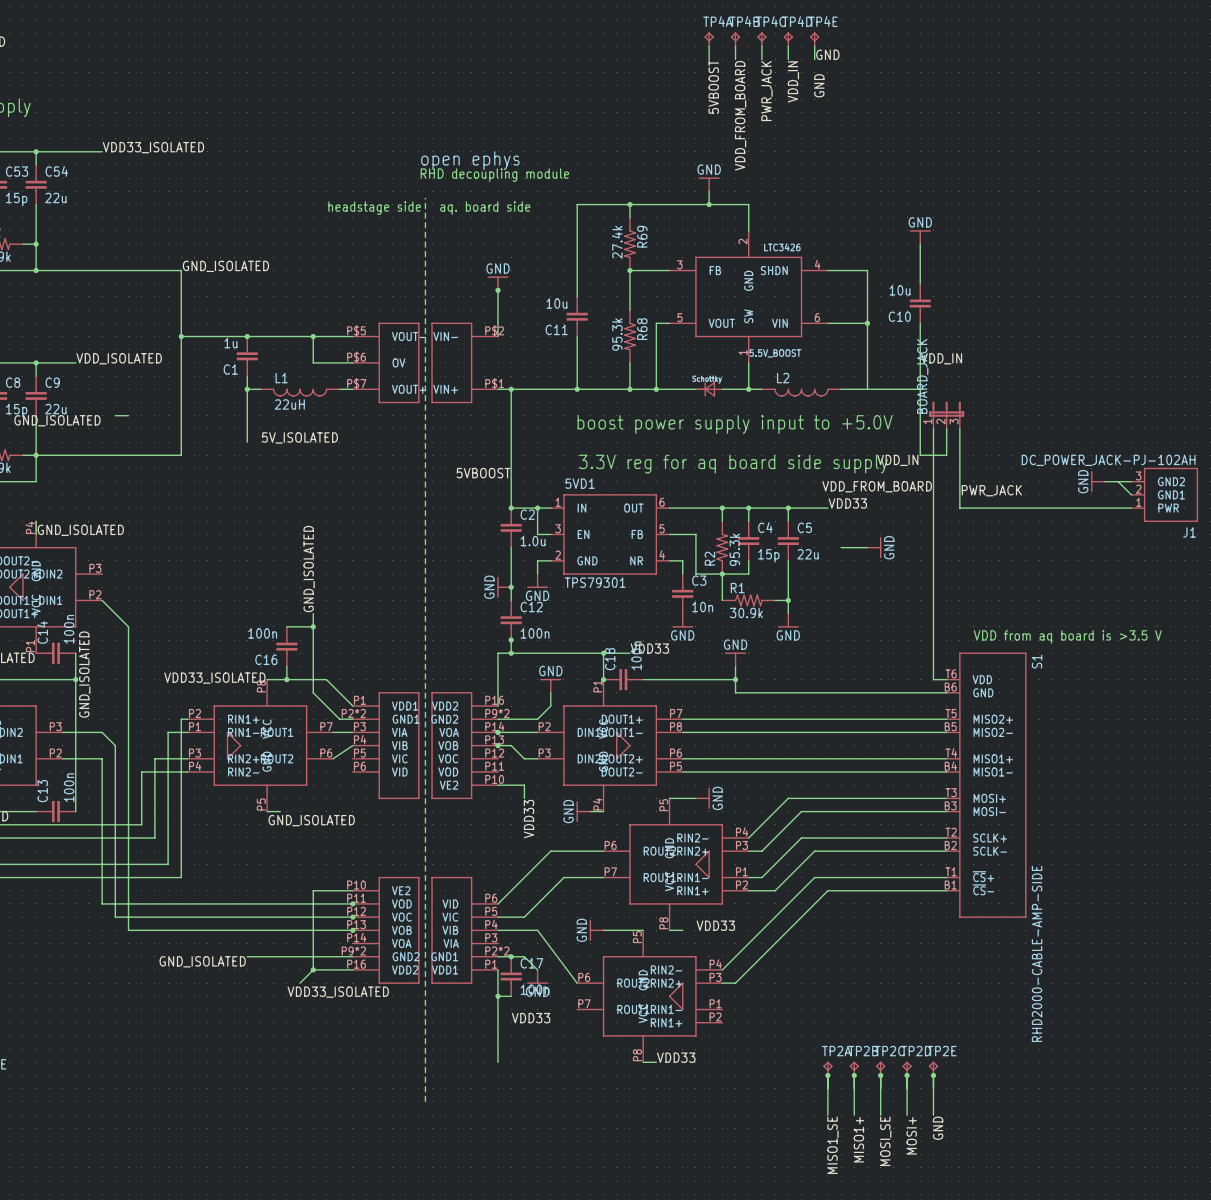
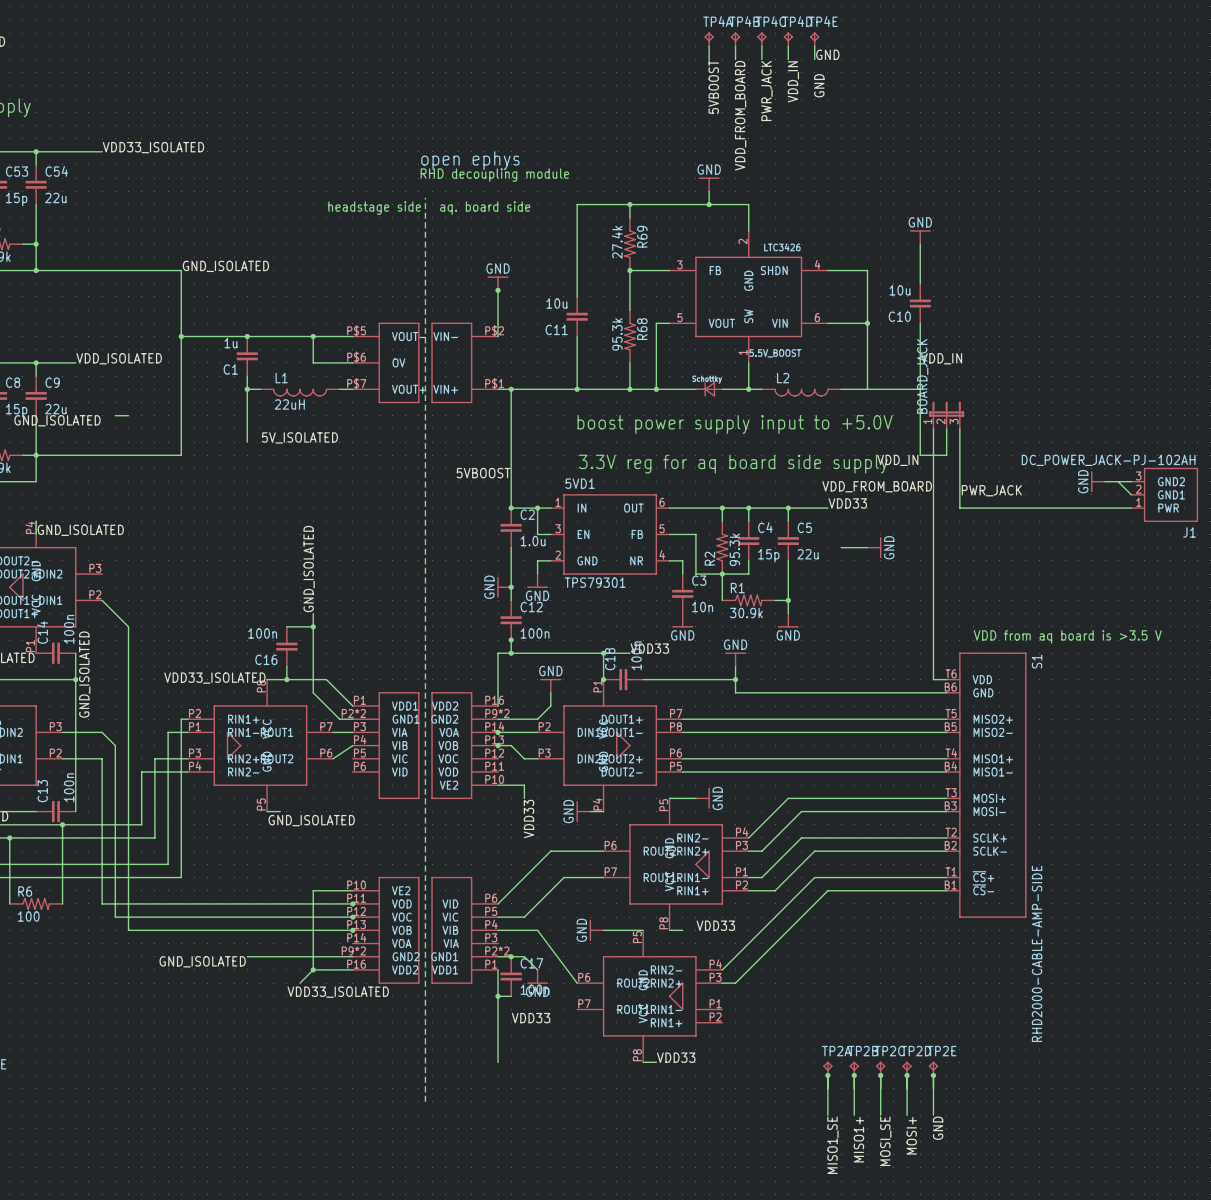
wire: none -> (62, 824) (62, 903)
junction: none -> (62, 824)
wire: none -> (9, 837) (9, 903)
junction: none -> (9, 837)
R6: none -> 100 (36, 903)

